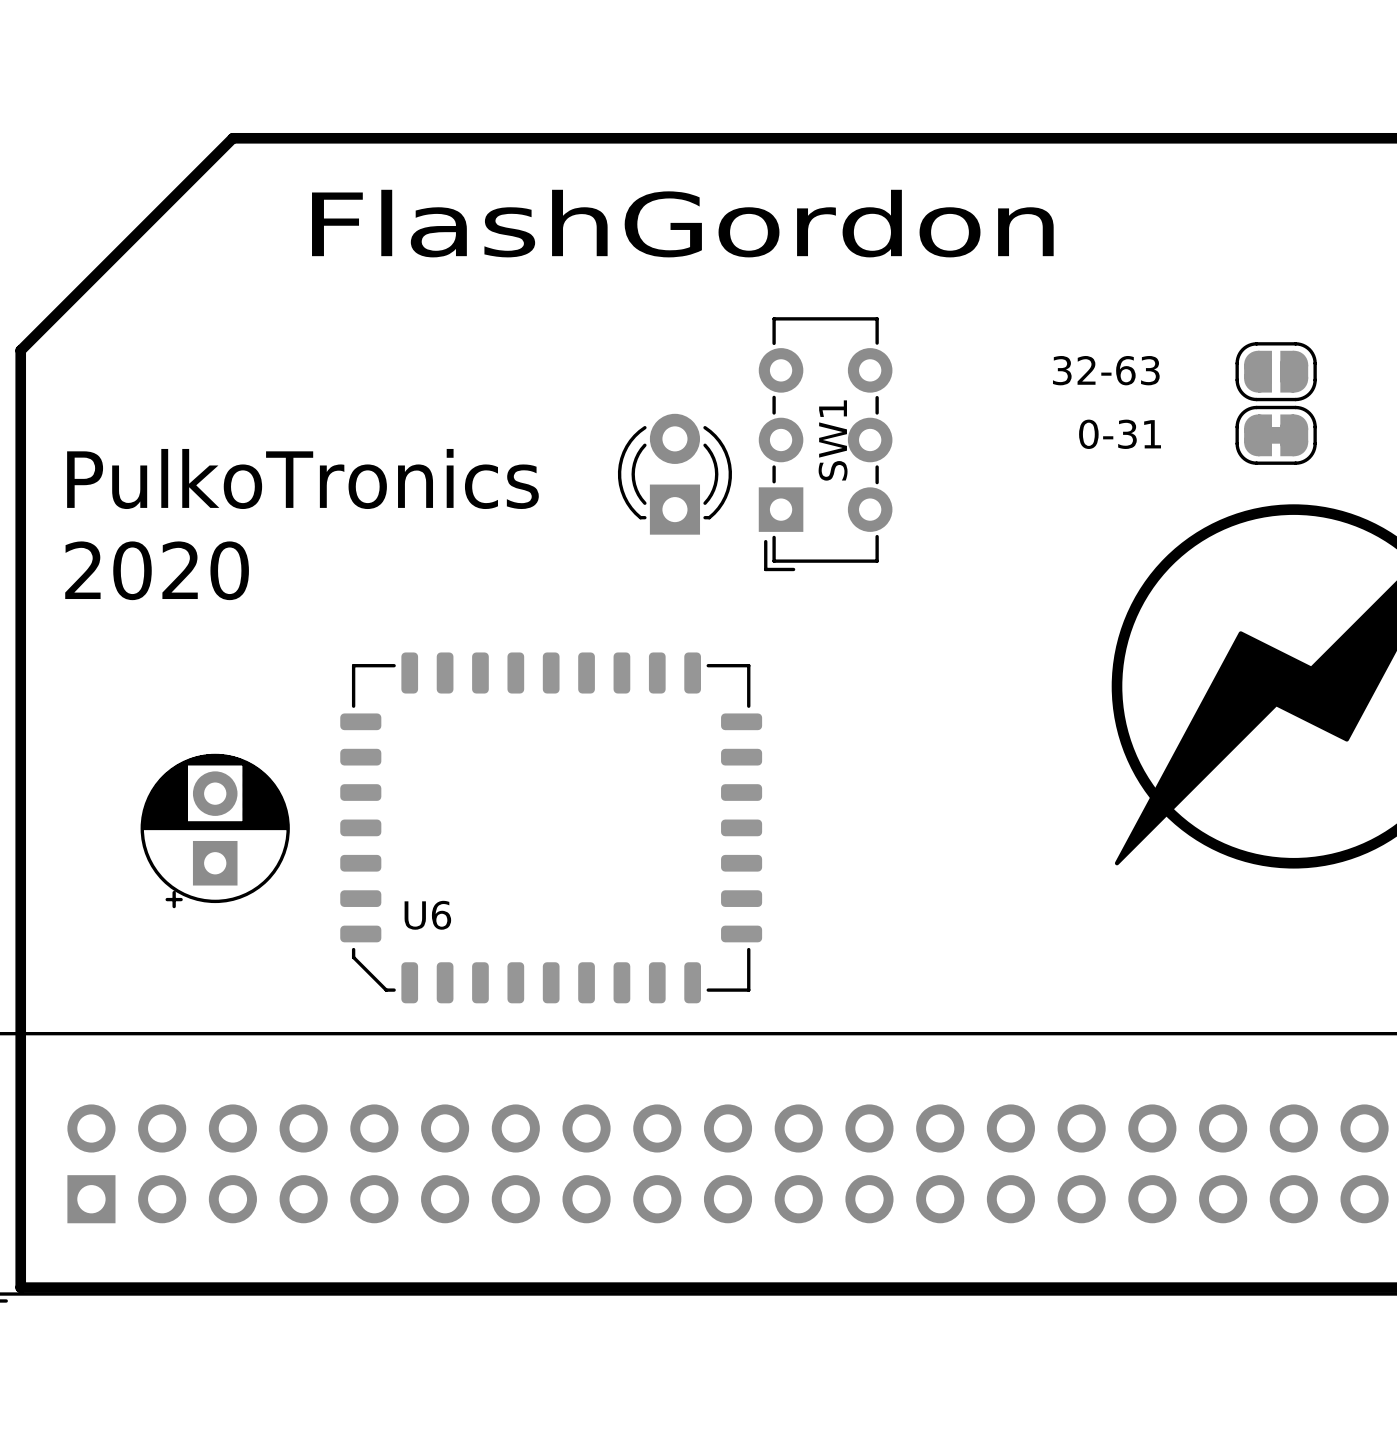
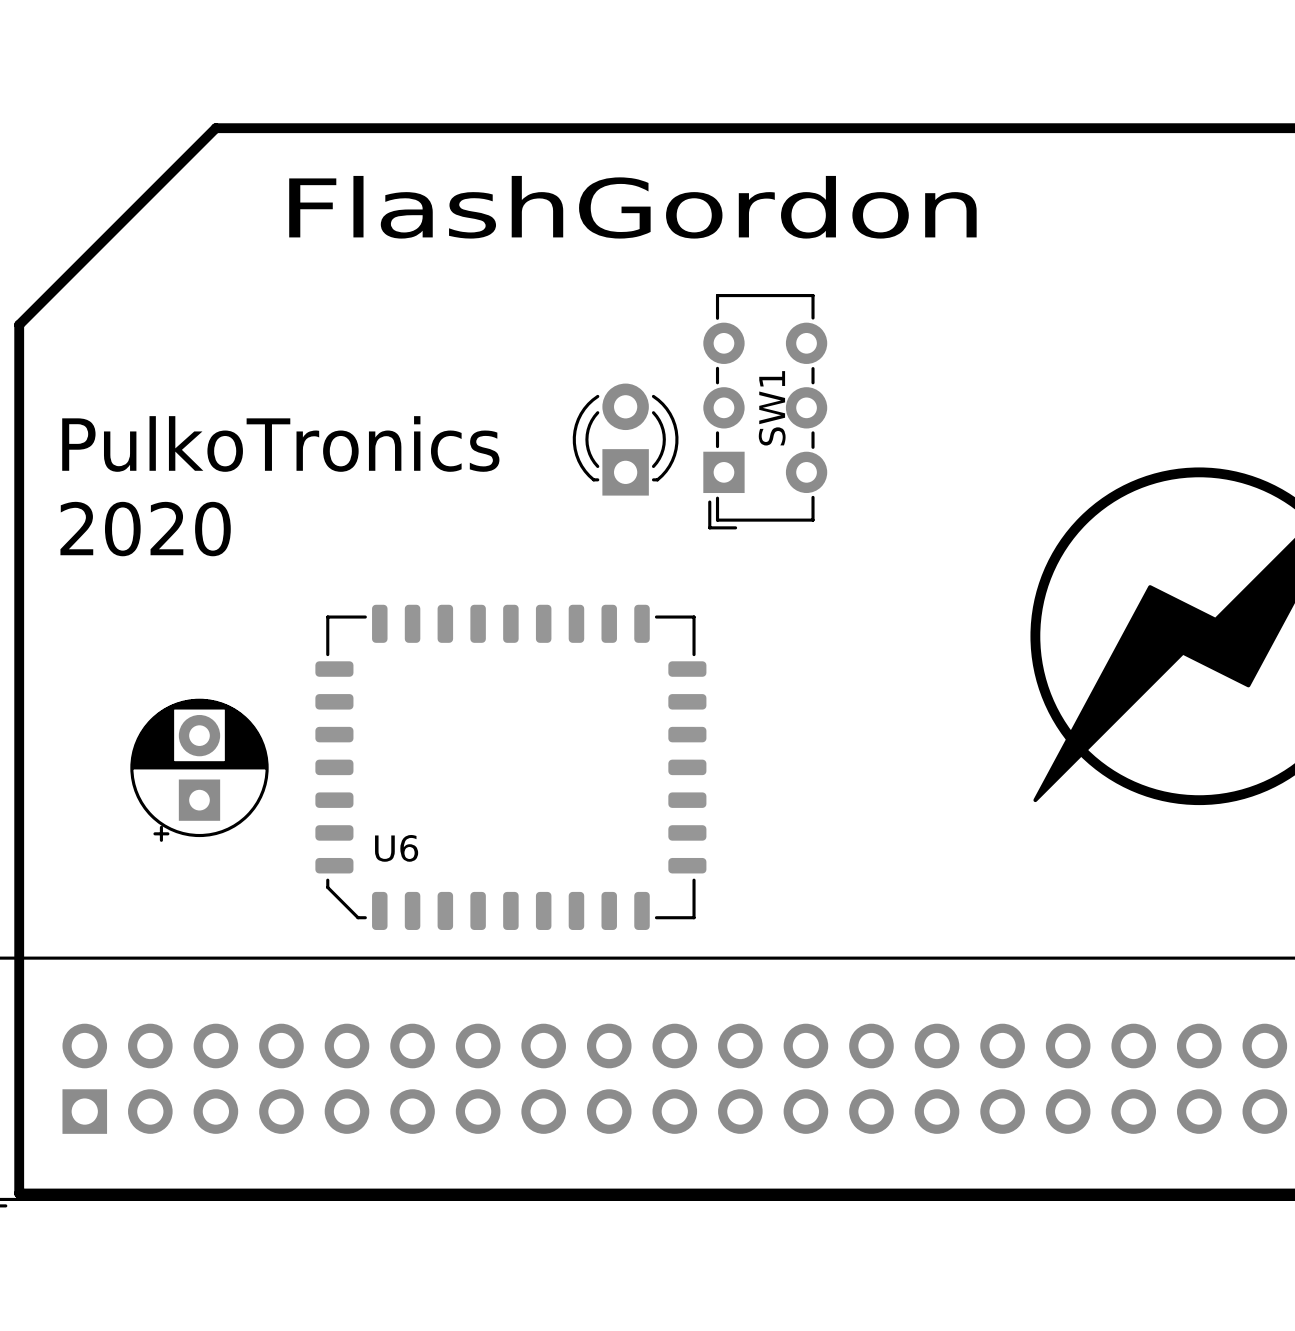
text: 32-63 (1106, 370) -> none
part: (1276, 371) -> none
text: 0-31 (1120, 434) -> none
part: (1276, 435) -> none

